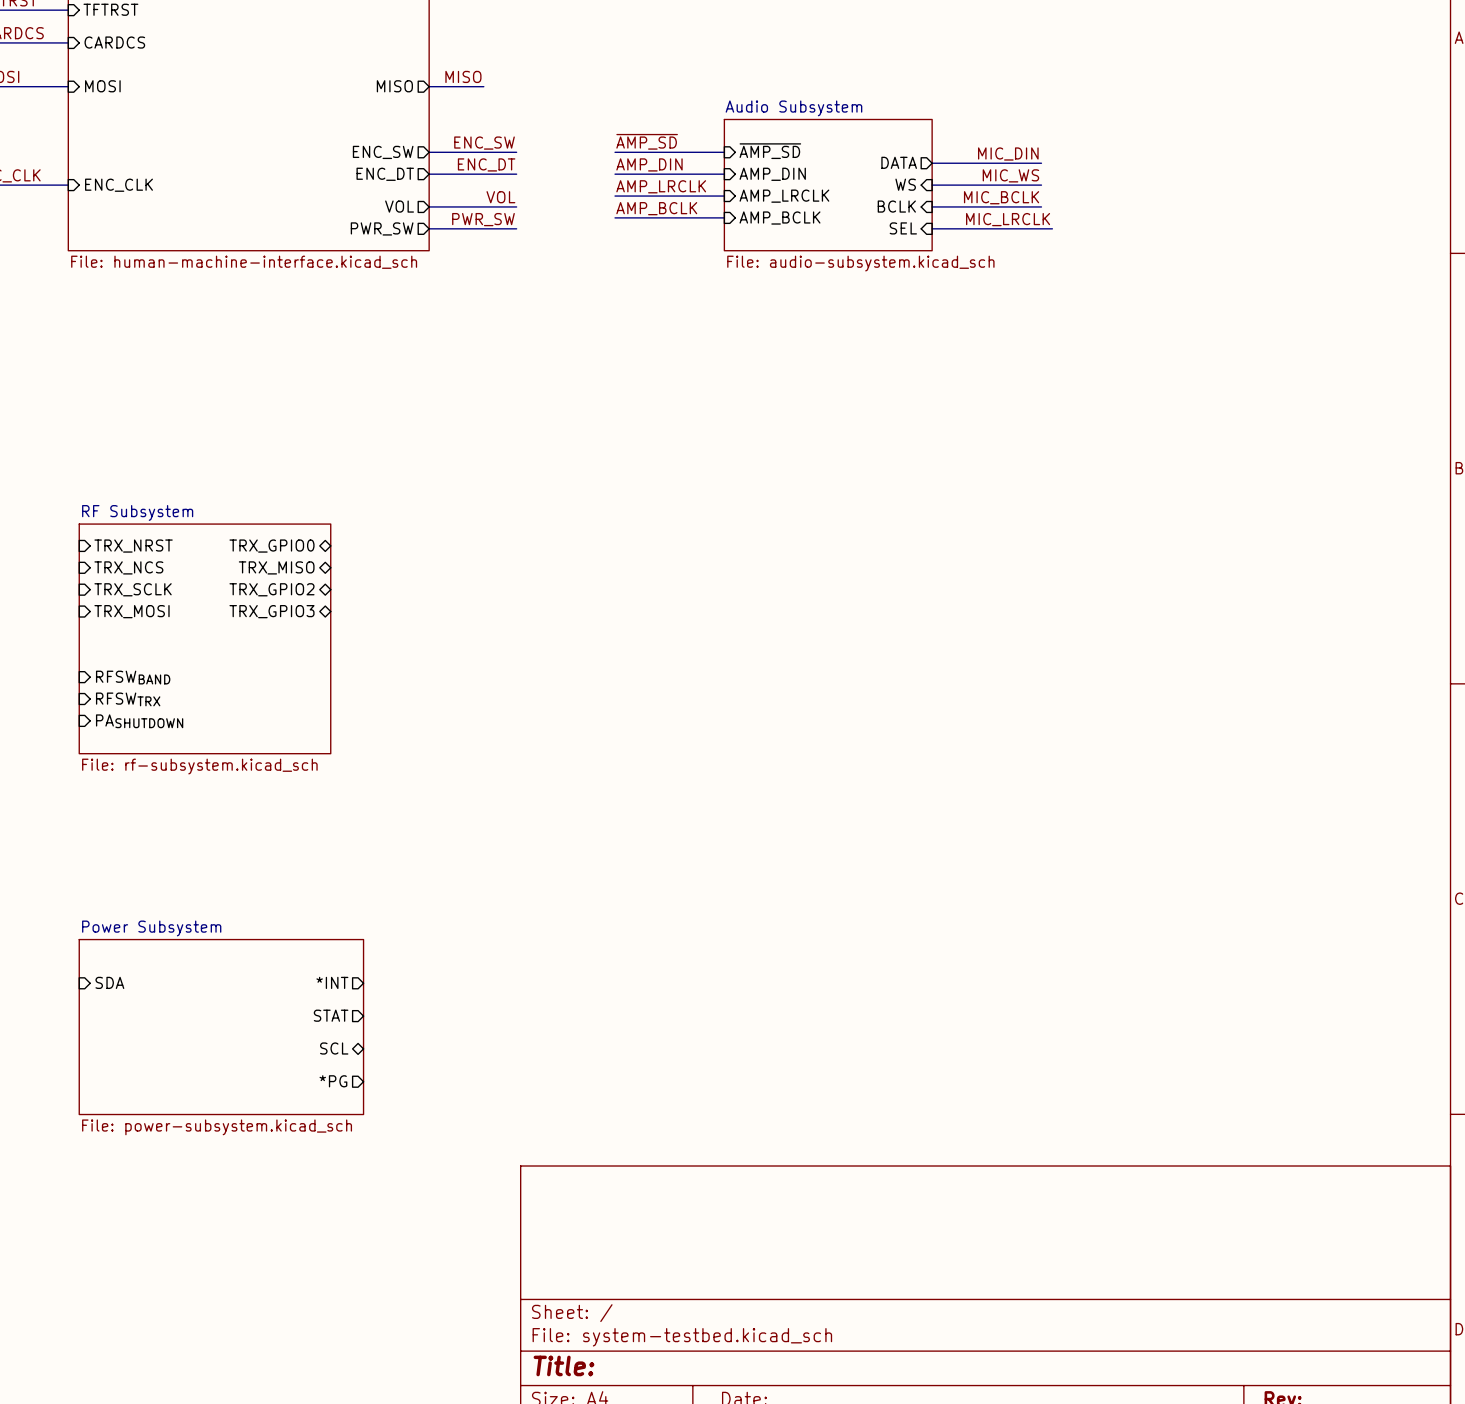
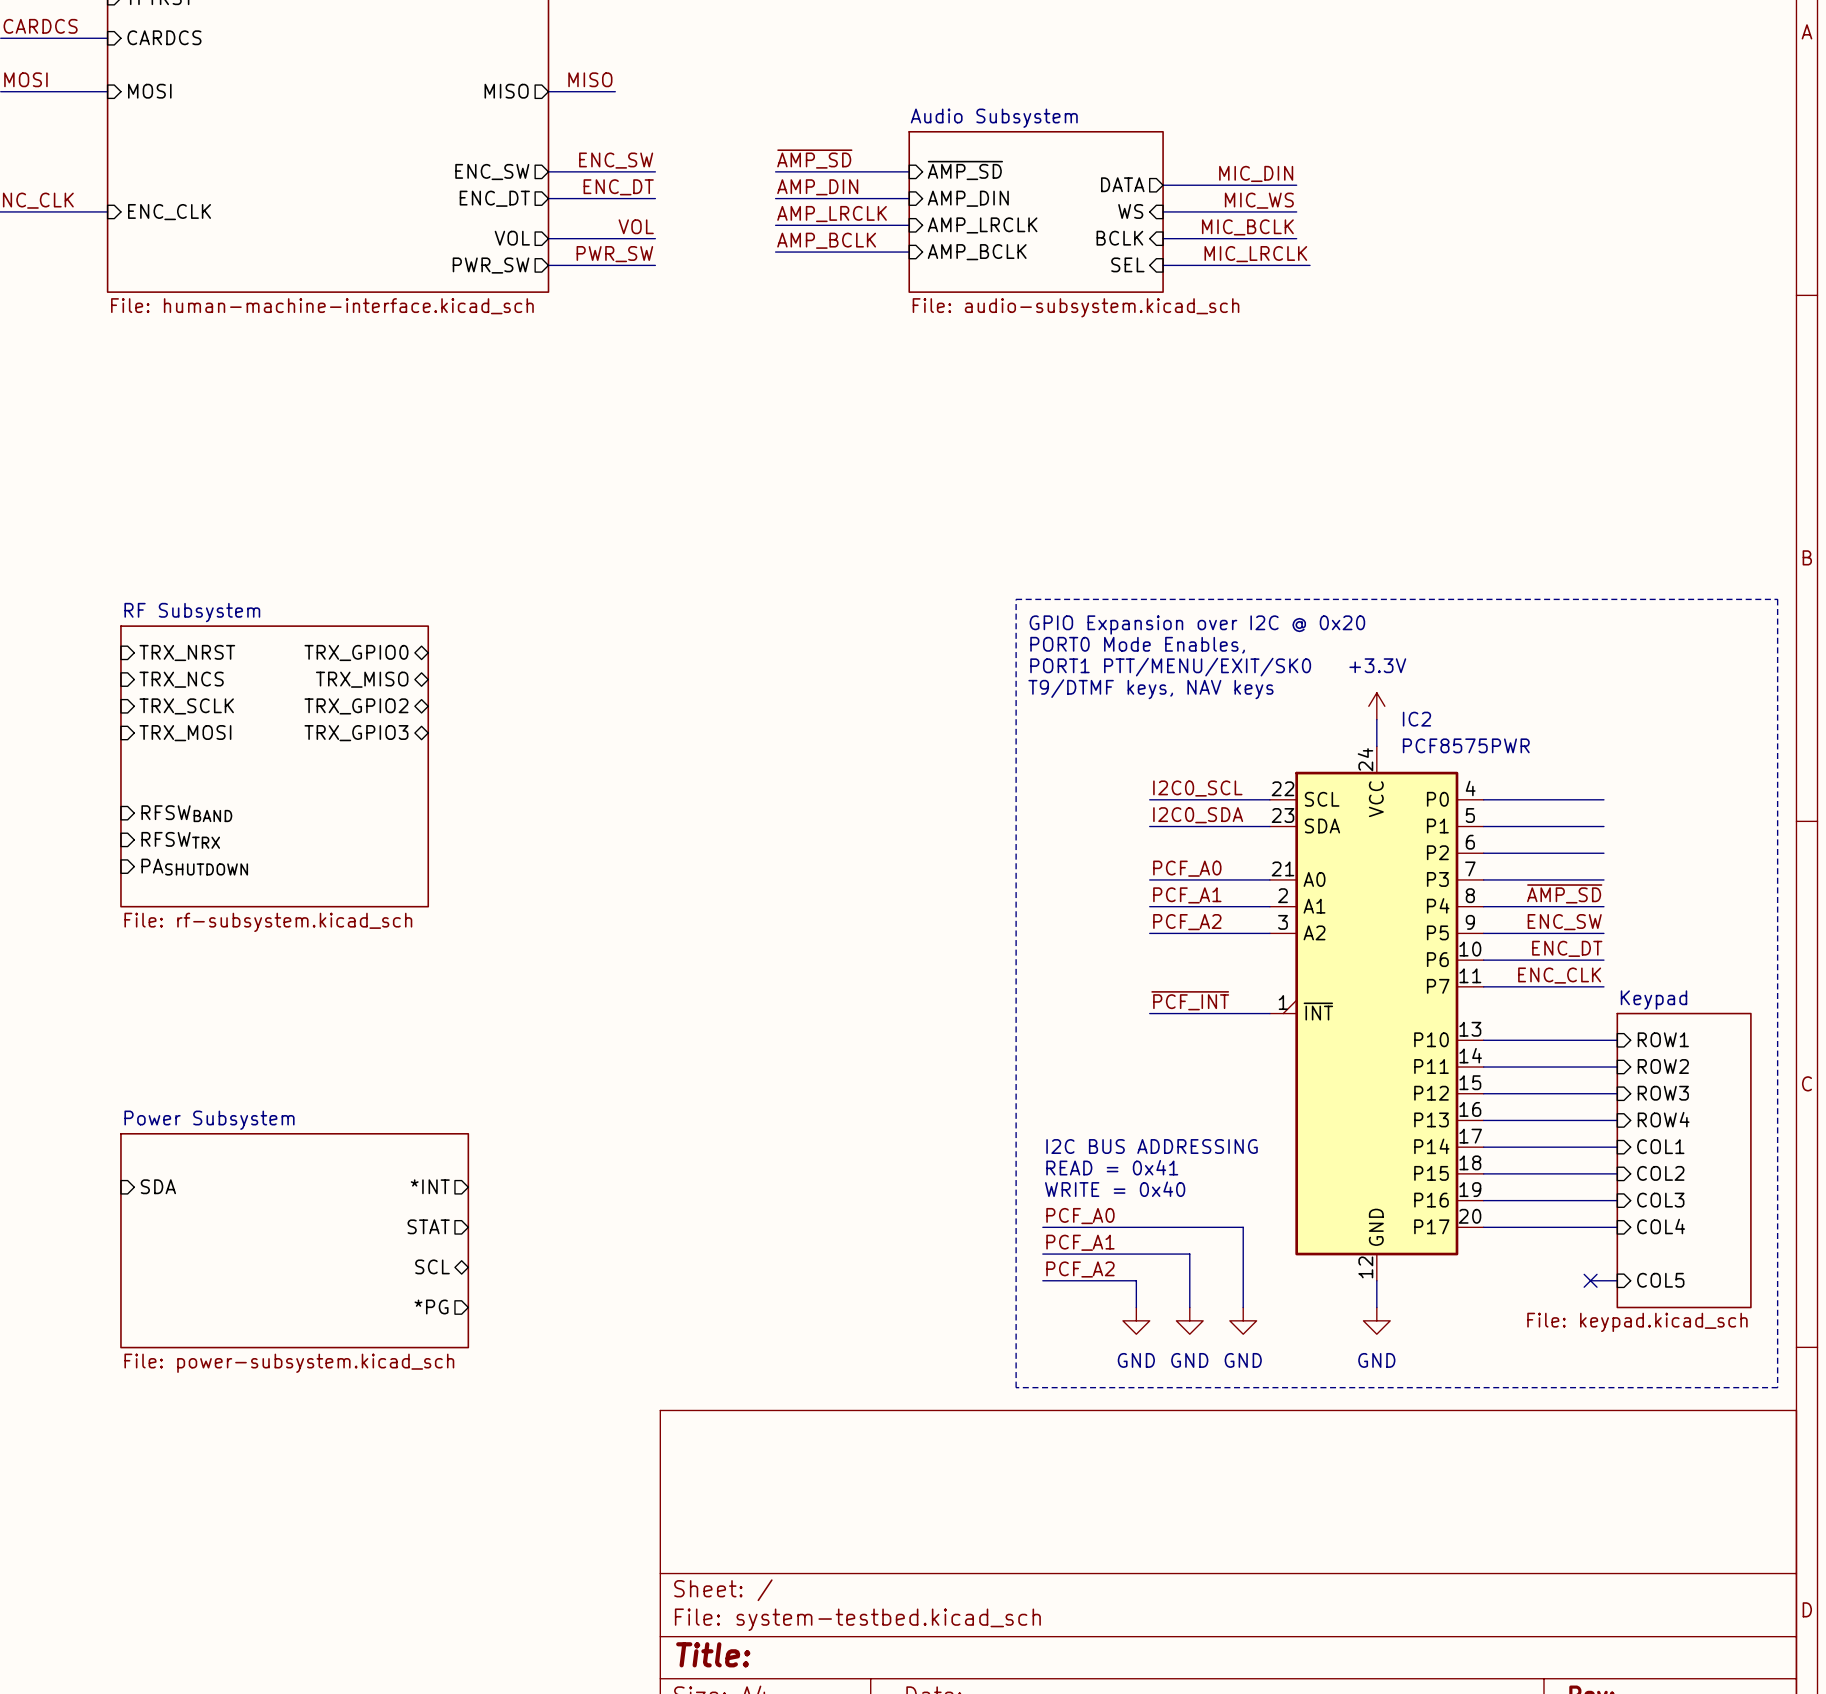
line: none -> (1016, 599) (1777, 599) (1777, 1387) (1016, 1387) (1016, 599)
text: none -> GPIO Expansion over I2C @ 0x20 (1197, 625)
text: none -> PORT0 Mode Enables, (1137, 645)
text: none -> PORT1 PTT/MENU/EXIT/SK0 (1170, 667)
text: none -> T9/DTMF keys, NAV keys (1150, 689)
power symbol: none -> +3.3V (1376, 706)
wire: none -> (1376, 719) (1376, 746)
label: none -> I2C0_SCL (1197, 788)
wire: none -> (1149, 799) (1269, 799)
wire: none -> (1483, 799) (1603, 799)
label: none -> I2C0_SDA (1198, 815)
wire: none -> (1149, 826) (1269, 826)
wire: none -> (1483, 826) (1603, 826)
wire: none -> (1483, 853) (1603, 853)
label: none -> PCF_A0 (1187, 868)
wire: none -> (1149, 879) (1269, 879)
wire: none -> (1483, 879) (1603, 879)
label: none -> ~{AMP_SD} (1564, 893)
label: none -> PCF_A1 (1187, 895)
wire: none -> (1149, 906) (1269, 906)
wire: none -> (1483, 906) (1603, 906)
label: none -> PCF_A2 (1187, 922)
label: none -> ENC_SW (1564, 922)
wire: none -> (1149, 933) (1269, 933)
wire: none -> (1483, 933) (1603, 933)
label: none -> ENC_DT (1567, 948)
wire: none -> (1483, 960) (1603, 960)
label: none -> ENC_CLK (1559, 975)
wire: none -> (1483, 986) (1603, 986)
label: none -> ~{PCF_INT} (1190, 1000)
wire: none -> (1149, 1013) (1269, 1013)
IC2: none -> PCF8575PWR (1376, 1013)
sheet pin: none -> ROW1 (1663, 1039)
wire: none -> (1483, 1040) (1617, 1040)
wire: none -> (1483, 1067) (1617, 1067)
sheet pin: none -> ROW2 (1663, 1066)
wire: none -> (1483, 1093) (1617, 1093)
sheet pin: none -> ROW3 (1663, 1093)
sheet pin: none -> ROW4 (1663, 1119)
wire: none -> (1483, 1120) (1617, 1120)
text: none -> I2C BUS ADDRESSING (1152, 1146)
wire: none -> (1483, 1147) (1617, 1147)
sheet pin: none -> COL1 (1660, 1146)
sheet Keypad: none -> File: keypad.kicad_sch (1684, 1160)
text: none -> READ = 0x41 (1112, 1167)
sheet pin: none -> COL2 (1660, 1173)
wire: none -> (1483, 1173) (1617, 1173)
text: none -> WRITE = 0x40 (1115, 1189)
sheet pin: none -> COL3 (1660, 1200)
wire: none -> (1483, 1200) (1617, 1200)
label: none -> PCF_A0 (1080, 1216)
sheet pin: none -> COL4 (1661, 1226)
wire: none -> (1042, 1227) (1243, 1227) (1243, 1307)
wire: none -> (1483, 1227) (1617, 1227)
label: none -> PCF_A1 (1080, 1242)
wire: none -> (1042, 1254) (1189, 1254) (1189, 1307)
label: none -> PCF_A2 (1080, 1269)
wire: none -> (1042, 1280) (1136, 1280) (1136, 1307)
wire: none -> (1376, 1280) (1376, 1307)
wire: none -> (1590, 1280) (1617, 1280)
no-connect mark: none -> (1590, 1280)
sheet pin: none -> COL5 (1660, 1280)
power symbol: none -> GND (1136, 1320)
power symbol: none -> GND (1189, 1320)
power symbol: none -> GND (1243, 1320)
power symbol: none -> GND (1376, 1320)

